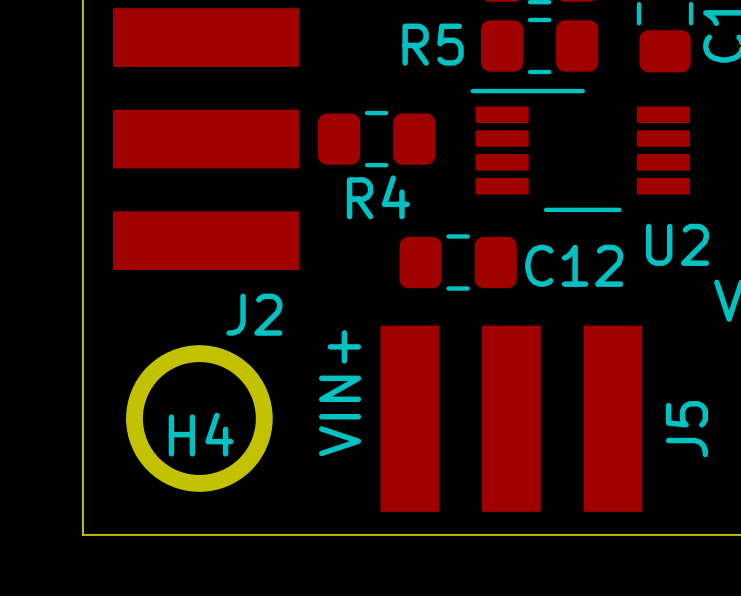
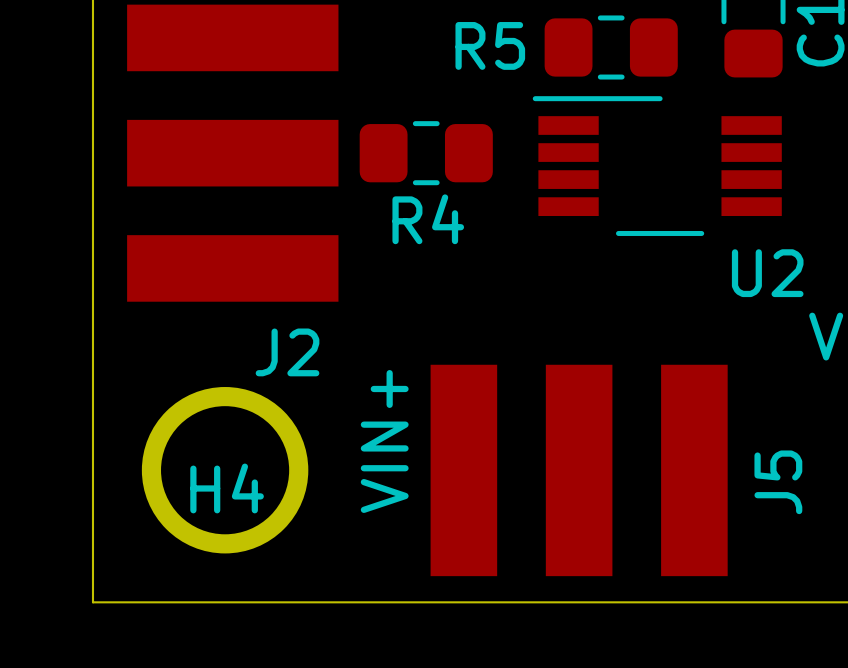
C12: (458, 262) -> none

